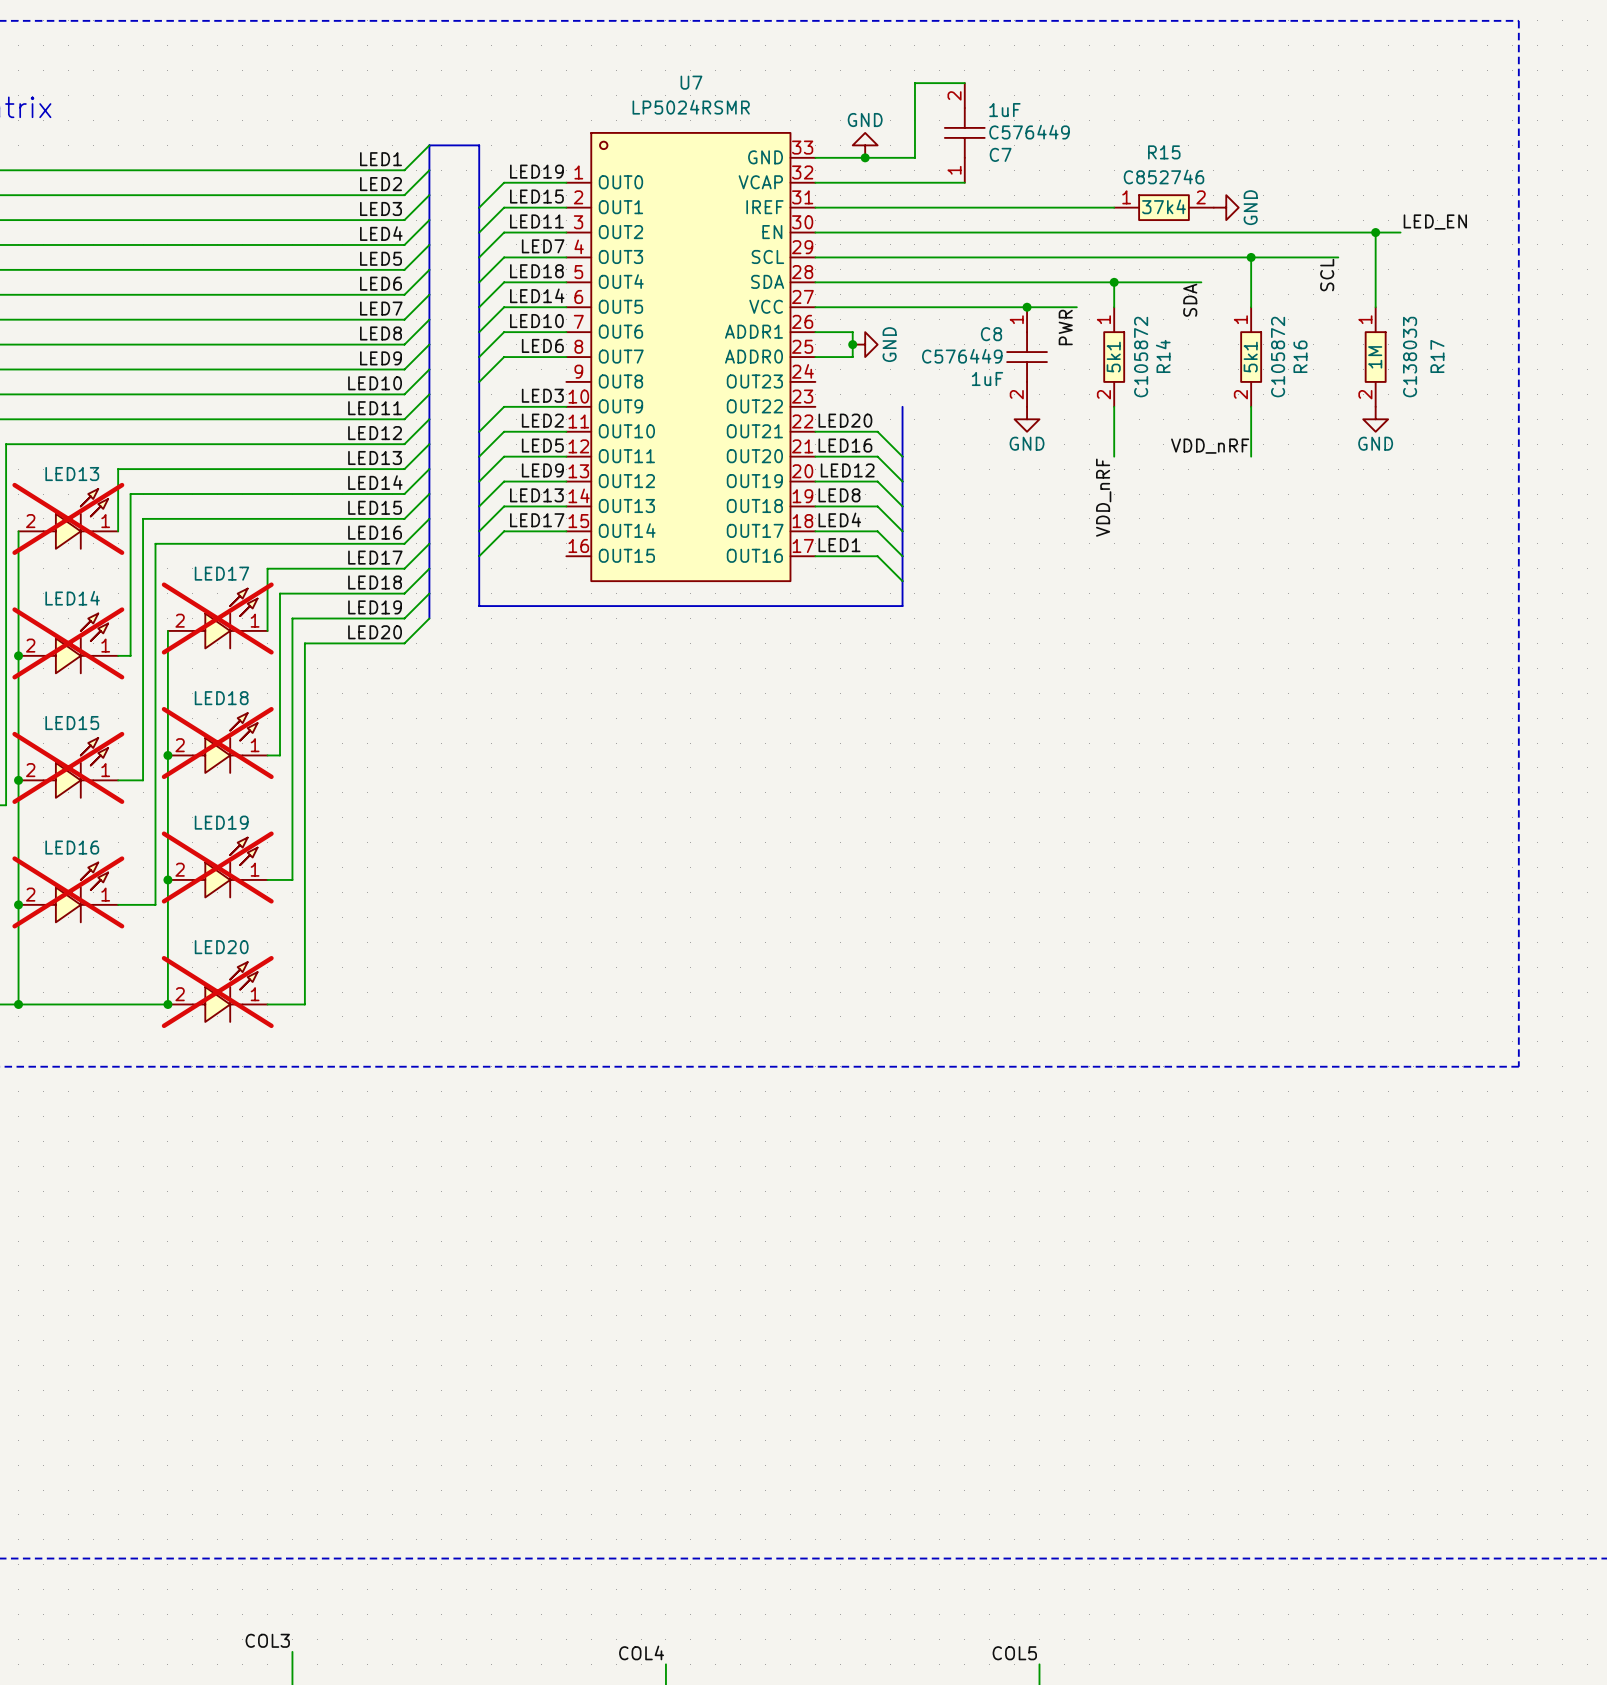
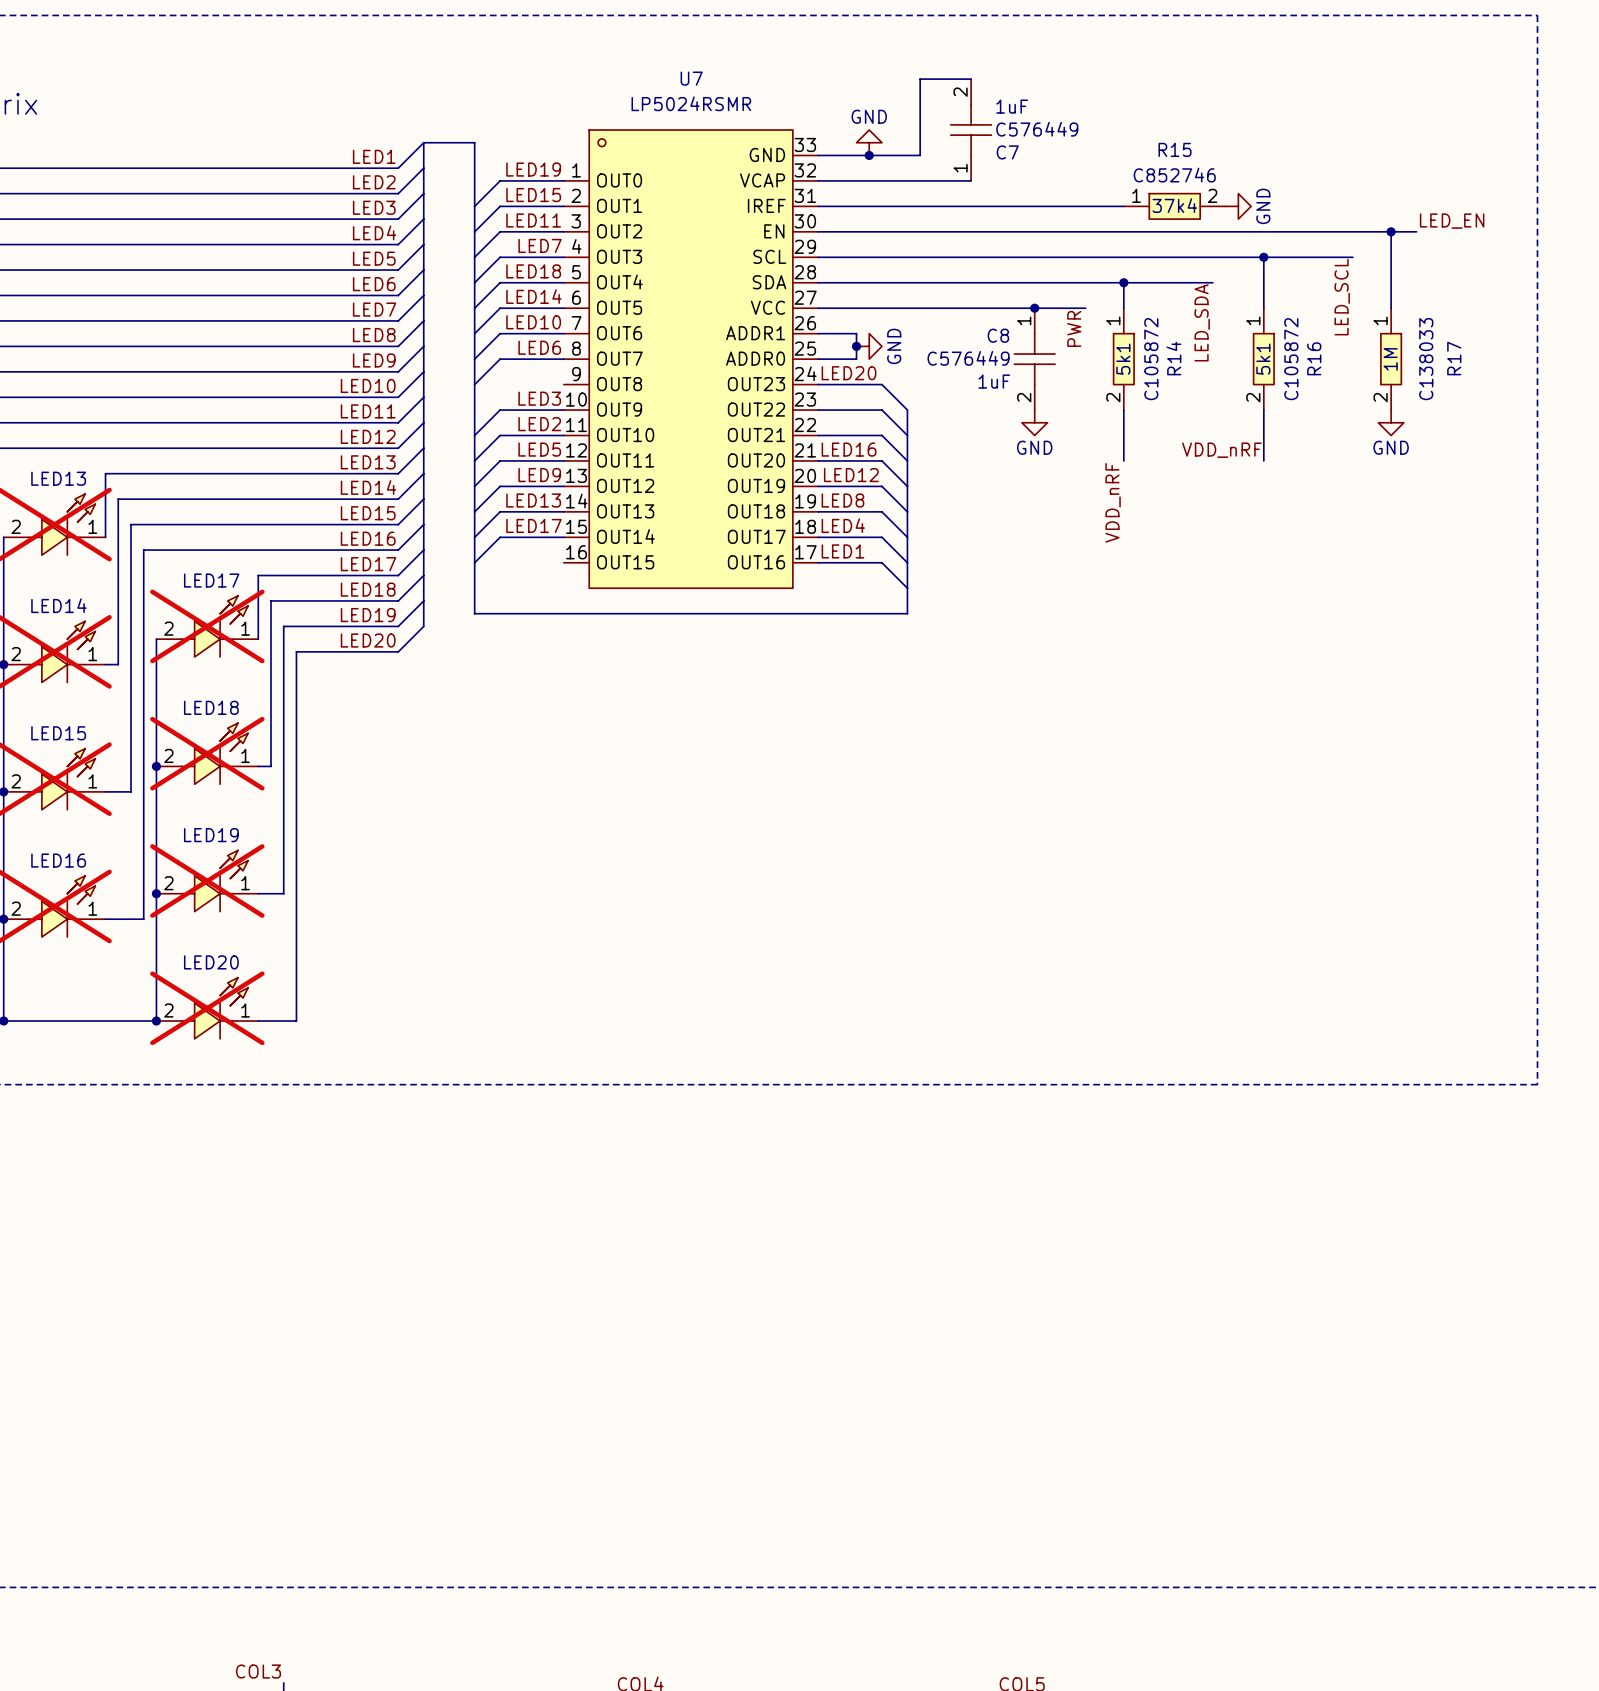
label: SCL (1327, 275) -> LED_SCL (1342, 297)
label: SDA (1190, 300) -> LED_SDA (1202, 322)
wire: none -> (818, 384) (881, 384) (907, 410)
wire: none -> (818, 410) (881, 410) (907, 435)
label position: LED20 (845, 420) -> LED20 (849, 373)

